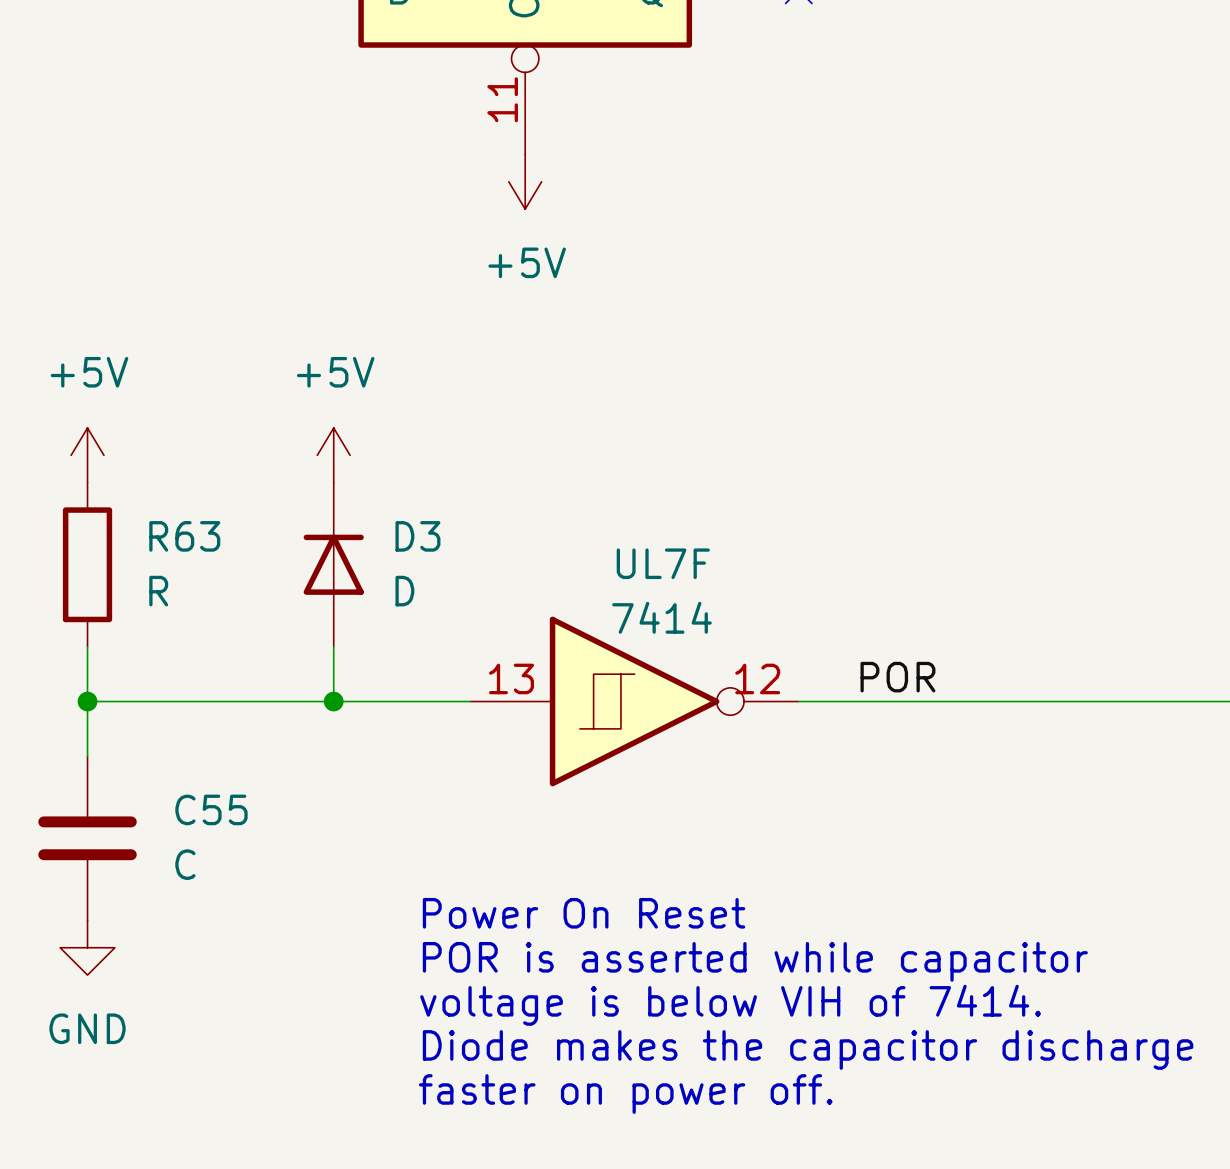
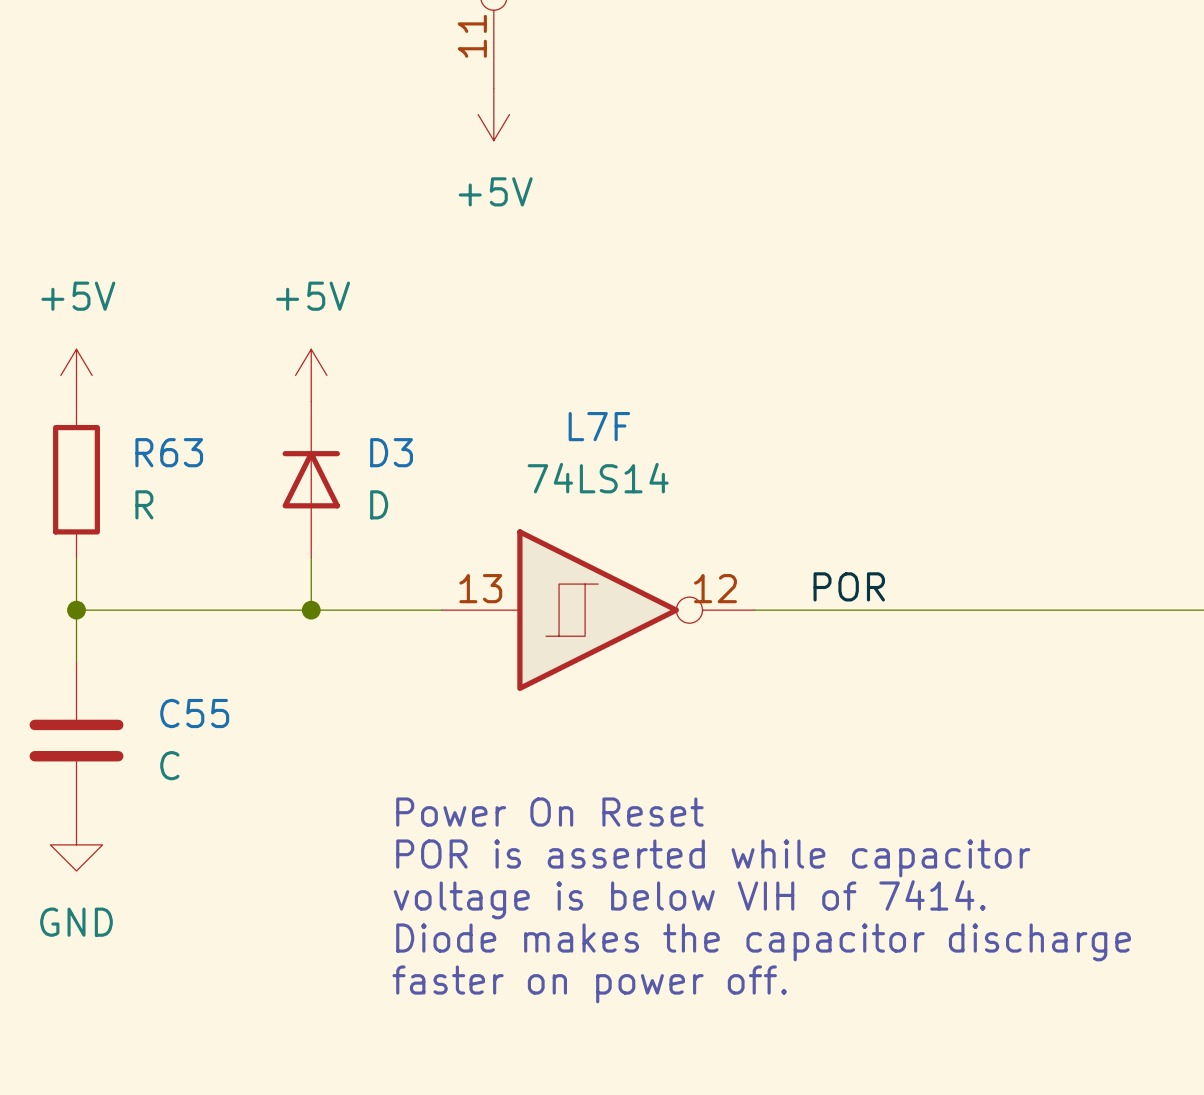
UL7F name: UL7F (663, 563) -> L7F (599, 426)
UL7F value: 7414 (661, 617) -> 74LS14 (598, 478)

